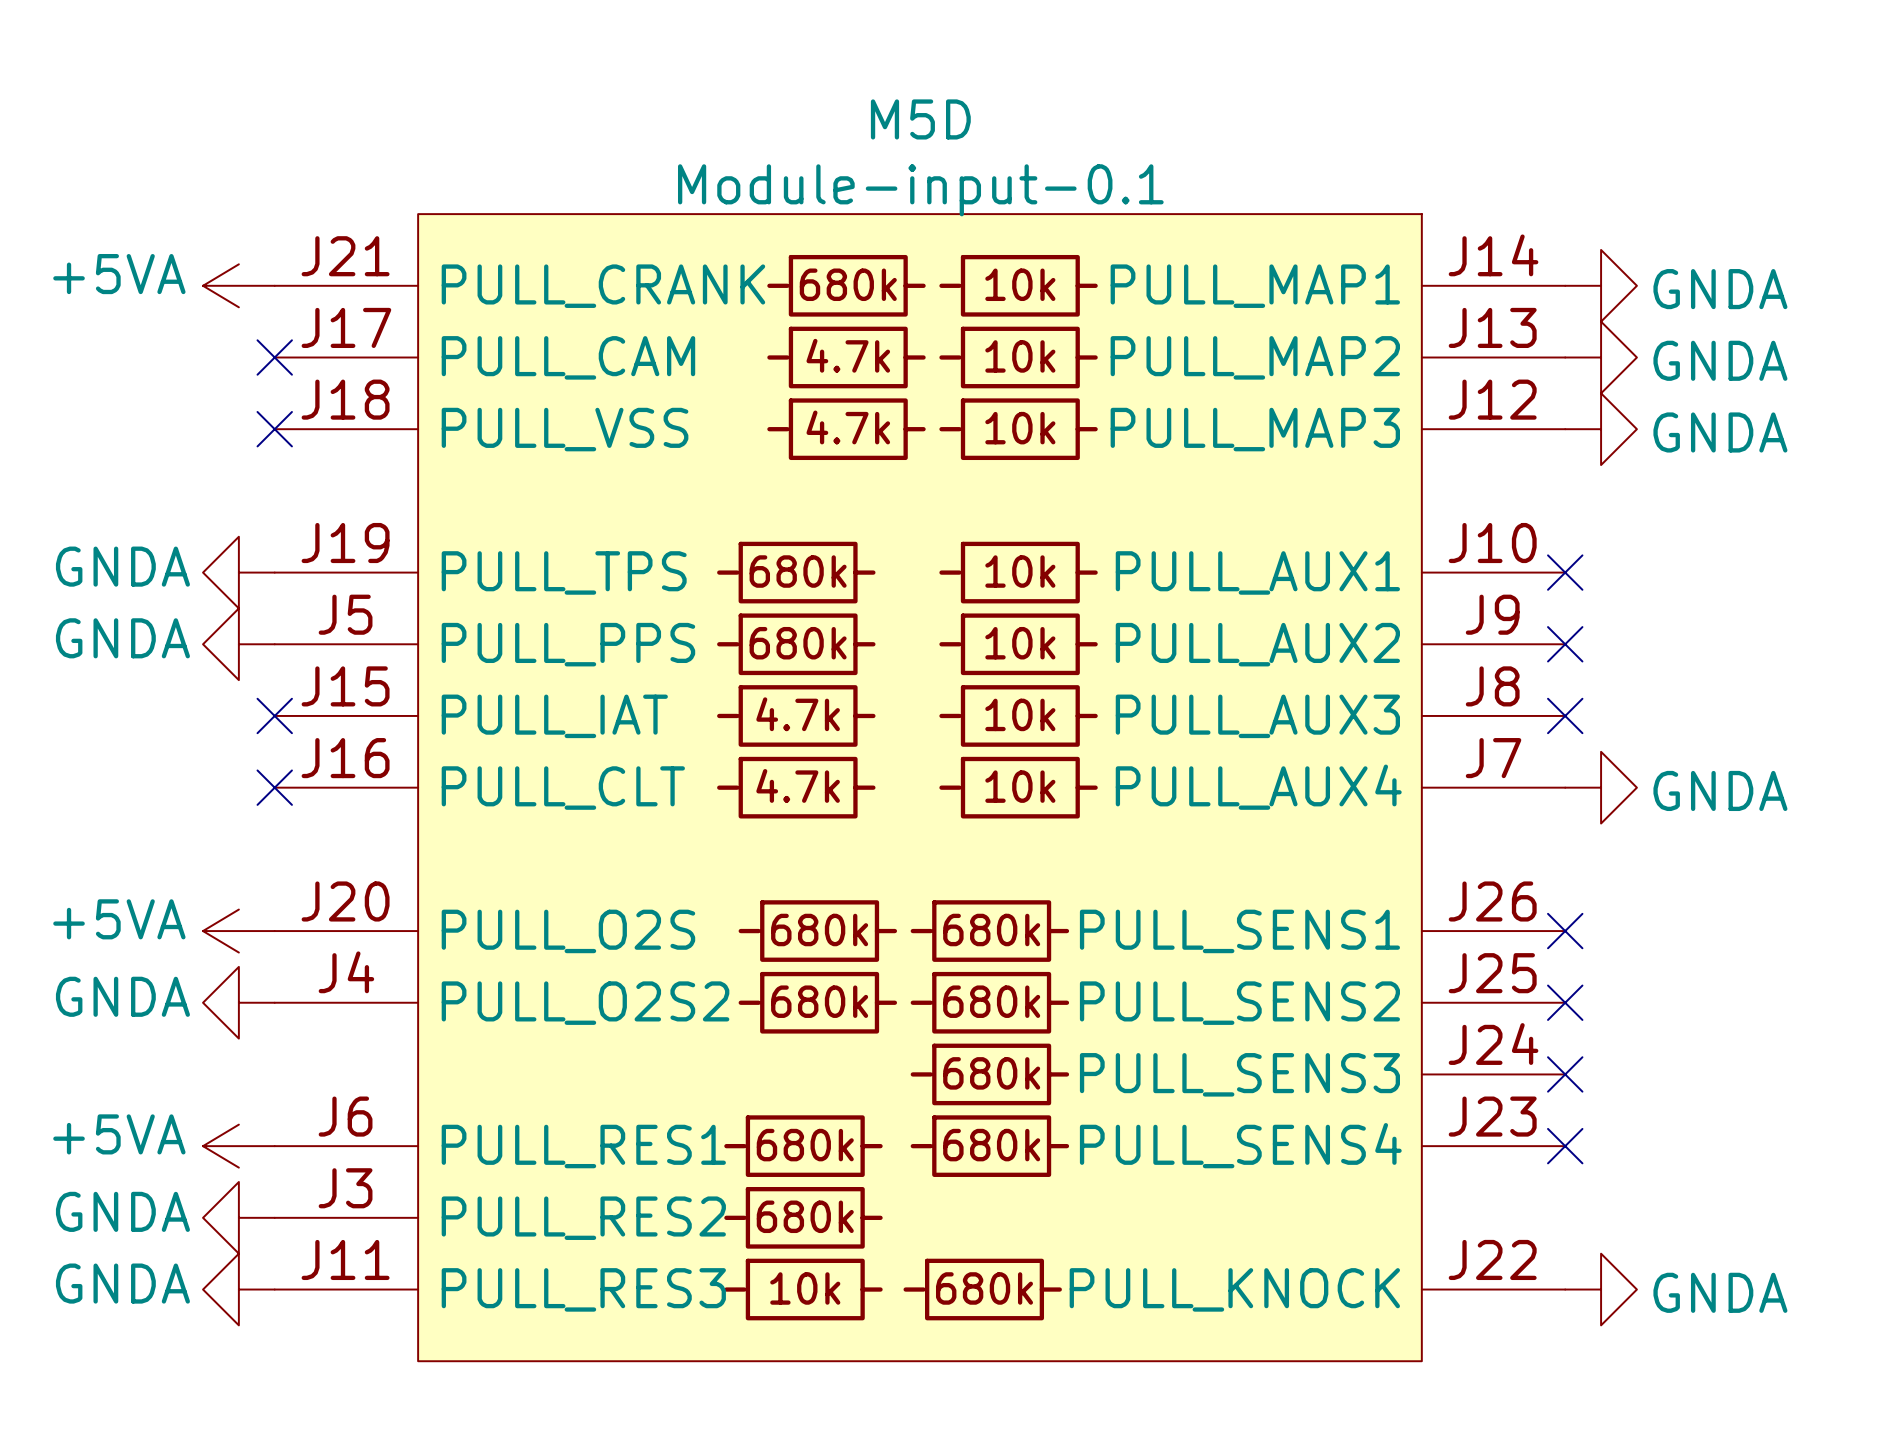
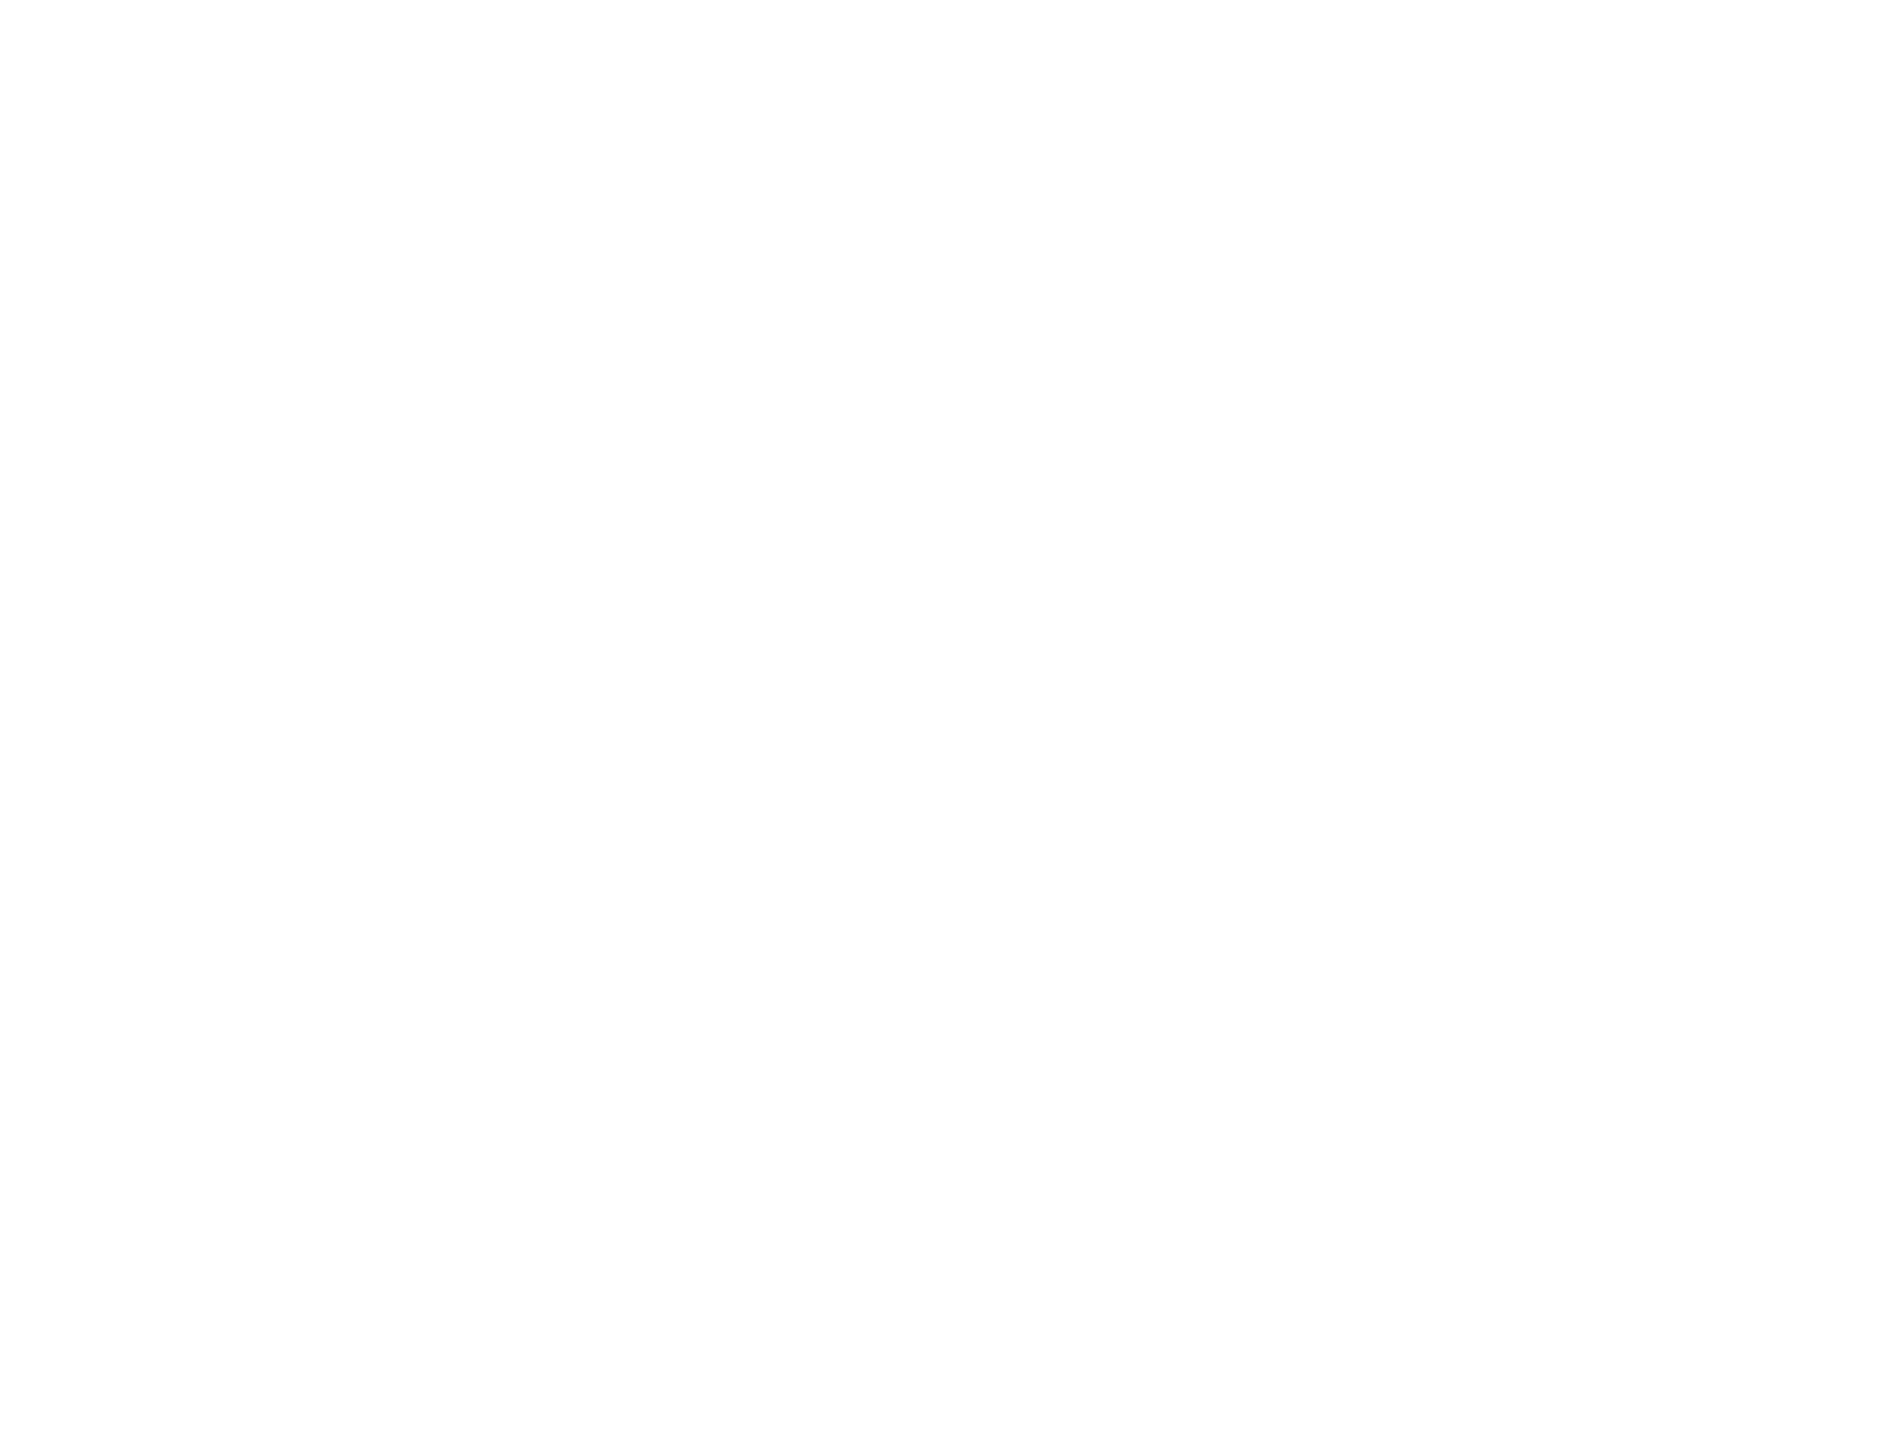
power symbol: +5VA (238, 285) -> none
power symbol: GNDA (1601, 285) -> none
no-connect mark: (274, 357) -> none
power symbol: GNDA (1601, 357) -> none
no-connect mark: (274, 429) -> none
power symbol: GNDA (1601, 429) -> none
power symbol: GNDA (238, 572) -> none
no-connect mark: (1565, 572) -> none
power symbol: GNDA (238, 644) -> none
no-connect mark: (1565, 644) -> none
no-connect mark: (274, 715) -> none
no-connect mark: (1565, 715) -> none
no-connect mark: (274, 787) -> none
M5D: Module-input-0.1 (919, 787) -> none
power symbol: GNDA (1601, 787) -> none
power symbol: +5VA (238, 931) -> none
no-connect mark: (1565, 931) -> none
power symbol: GNDA (238, 1002) -> none
no-connect mark: (1565, 1002) -> none
no-connect mark: (1565, 1074) -> none
power symbol: +5VA (238, 1146) -> none
no-connect mark: (1565, 1146) -> none
power symbol: GNDA (238, 1217) -> none
power symbol: GNDA (238, 1289) -> none
power symbol: GNDA (1601, 1289) -> none

